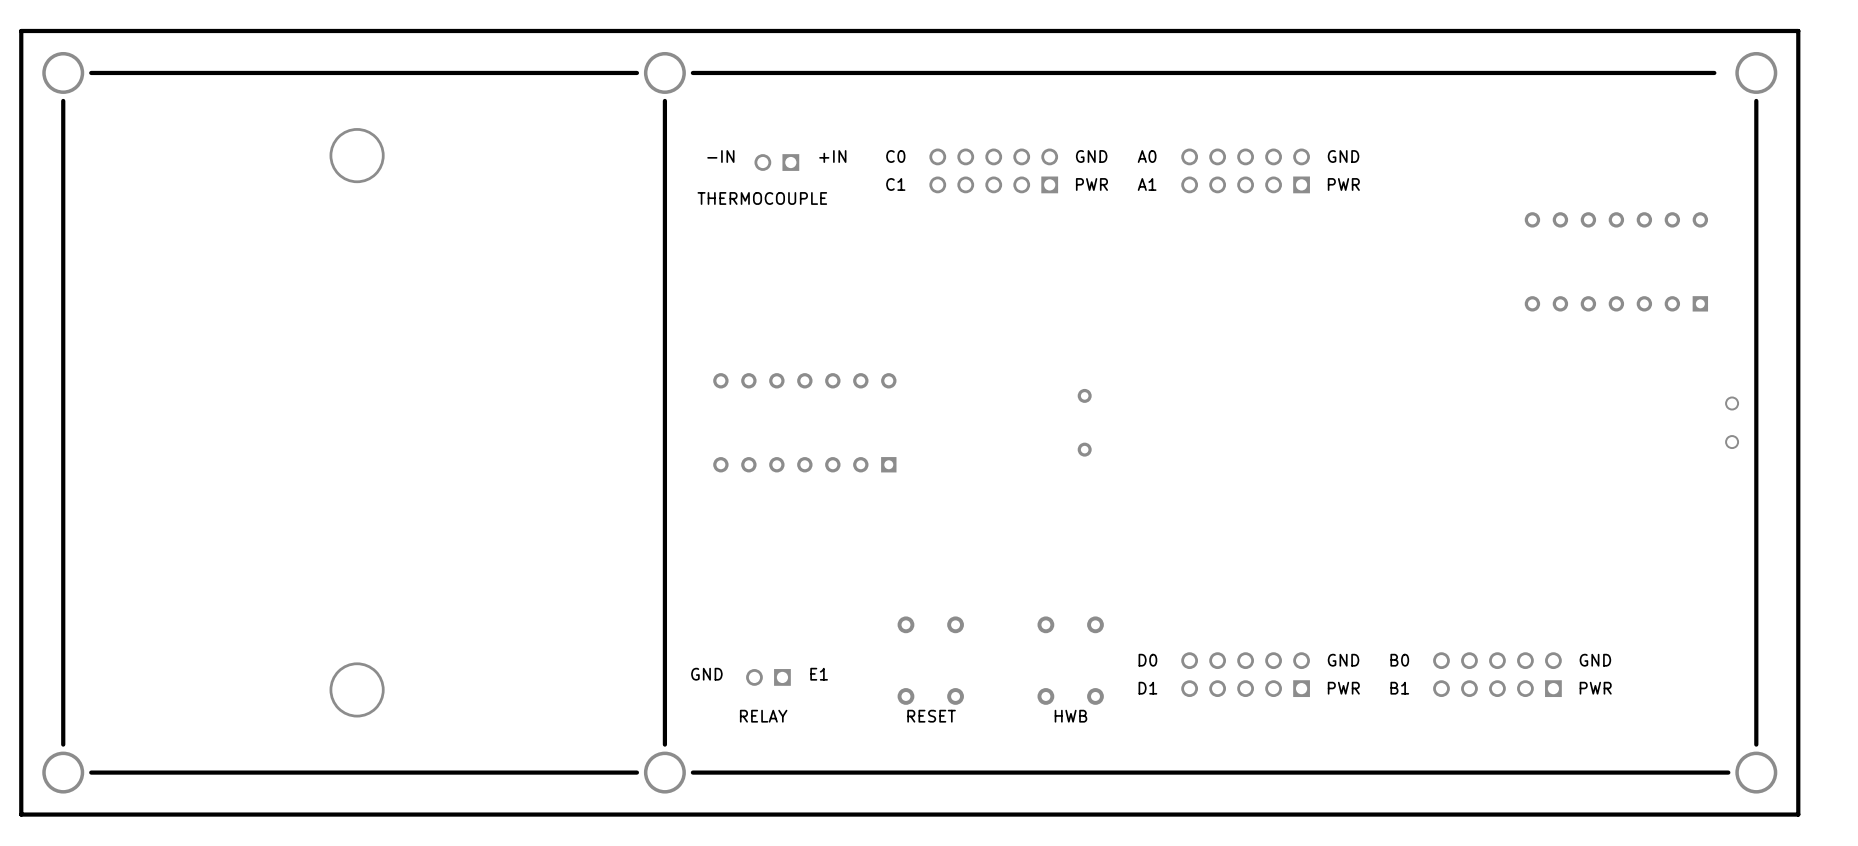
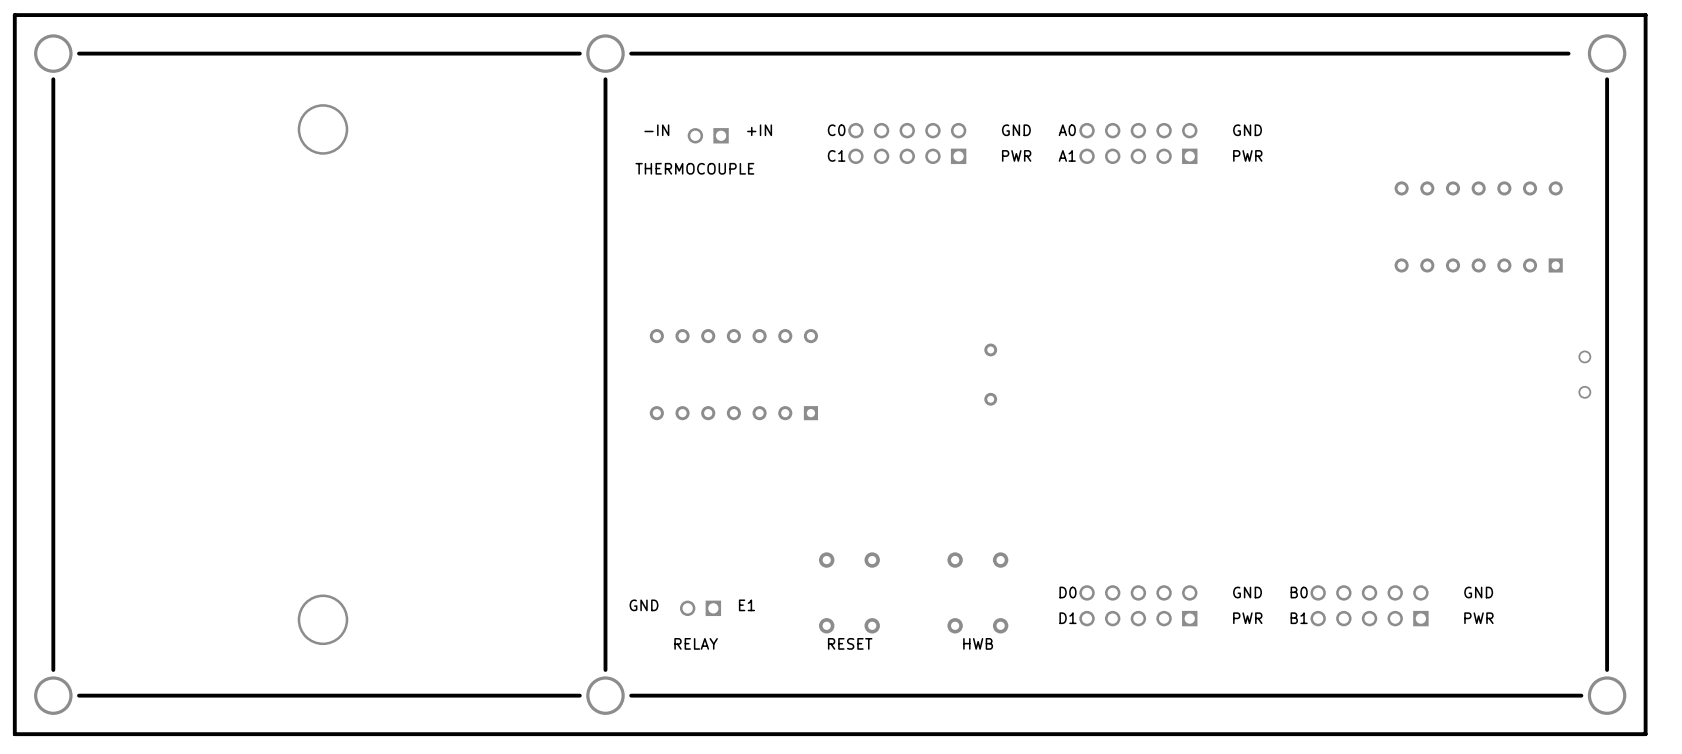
text position: C0 (895, 156) -> C0 (836, 130)
text position: GND (1091, 156) -> GND (1016, 130)
text position: A0 (1147, 156) -> A0 (1067, 130)
text position: GND (1343, 156) -> GND (1247, 130)
text position: C1 (895, 184) -> C1 (836, 155)
text position: PWR (1091, 184) -> PWR (1016, 155)
text position: A1 (1147, 184) -> A1 (1067, 155)
text position: PWR (1343, 184) -> PWR (1247, 155)
text position: D0 (1147, 660) -> D0 (1068, 592)
text position: GND (1343, 660) -> GND (1247, 592)
text position: B0 (1399, 660) -> B0 (1299, 592)
text position: GND (1595, 660) -> GND (1478, 592)
text position: D1 (1147, 688) -> D1 (1068, 618)
text position: PWR (1343, 688) -> PWR (1247, 618)
text position: B1 (1399, 688) -> B1 (1299, 618)
text position: PWR (1595, 688) -> PWR (1478, 618)

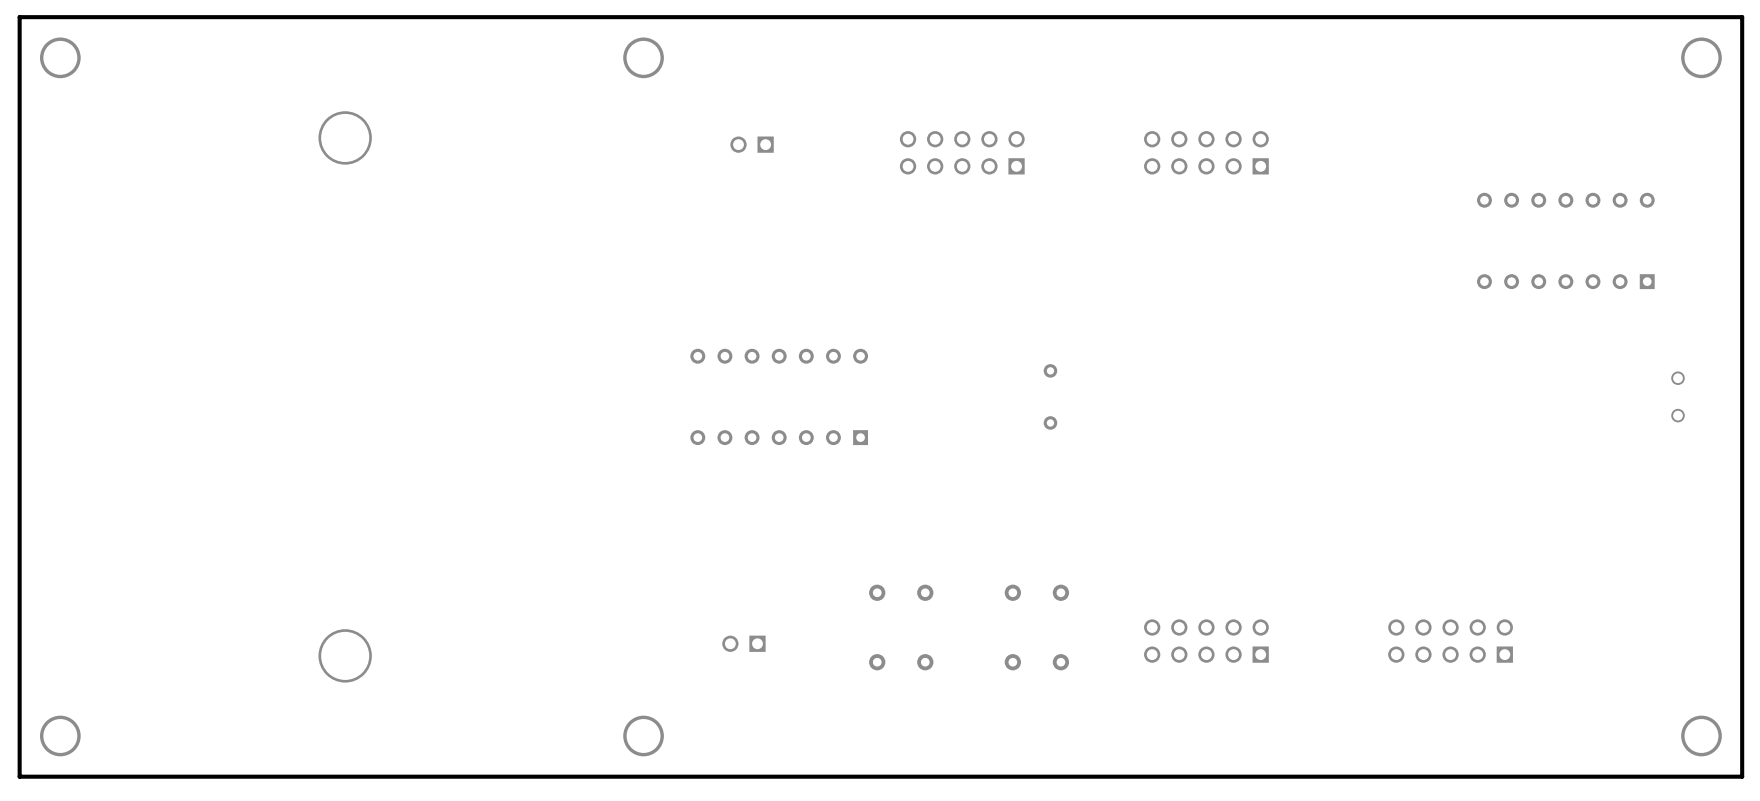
line: (579, 53) (79, 53) -> none
line: (1568, 53) (631, 53) -> none
line: (53, 79) (53, 669) -> none
line: (605, 79) (605, 669) -> none
line: (1607, 79) (1607, 669) -> none
text: -IN (656, 130) -> none
text: +IN (759, 130) -> none
text: C0 (836, 130) -> none
text: GND (1016, 130) -> none
text: A0 (1067, 130) -> none
text: GND (1247, 130) -> none
text: C1 (836, 155) -> none
text: PWR (1016, 155) -> none
text: A1 (1067, 155) -> none
text: PWR (1247, 155) -> none
text: THERMOCOUPLE (694, 168) -> none
text: D0 (1068, 592) -> none
text: GND (1247, 592) -> none
text: B0 (1299, 592) -> none
text: GND (1478, 592) -> none
text: GND (644, 605) -> none
text: E1 (746, 605) -> none
text: D1 (1068, 618) -> none
text: PWR (1247, 618) -> none
text: B1 (1299, 618) -> none
text: PWR (1478, 618) -> none
text: RELAY (696, 643) -> none
text: RESET (850, 643) -> none
text: HWB (978, 643) -> none
line: (579, 695) (79, 695) -> none
line: (1581, 695) (631, 695) -> none

